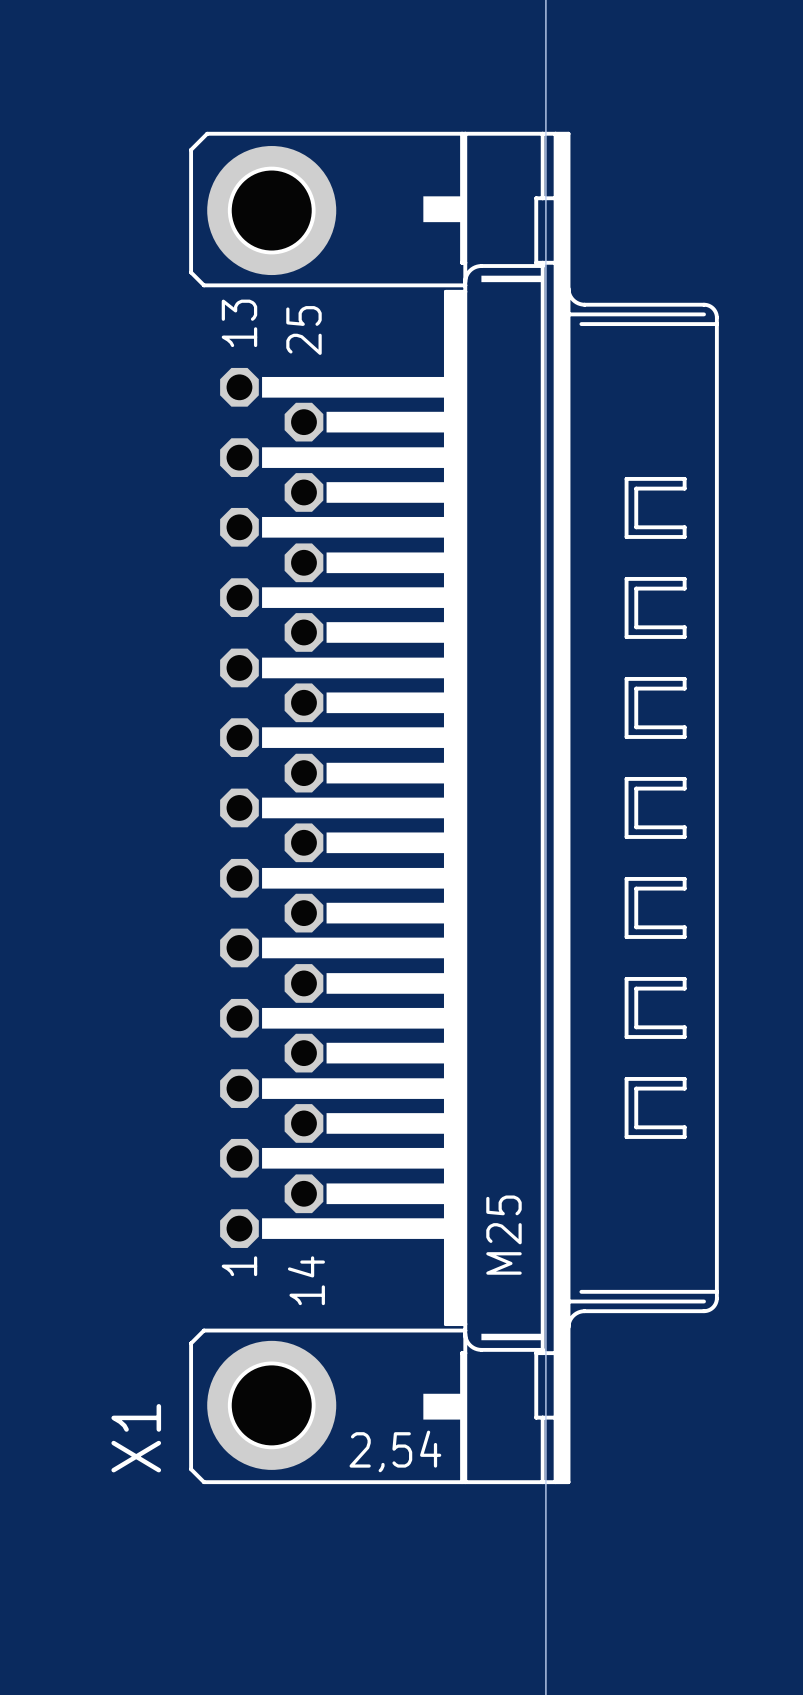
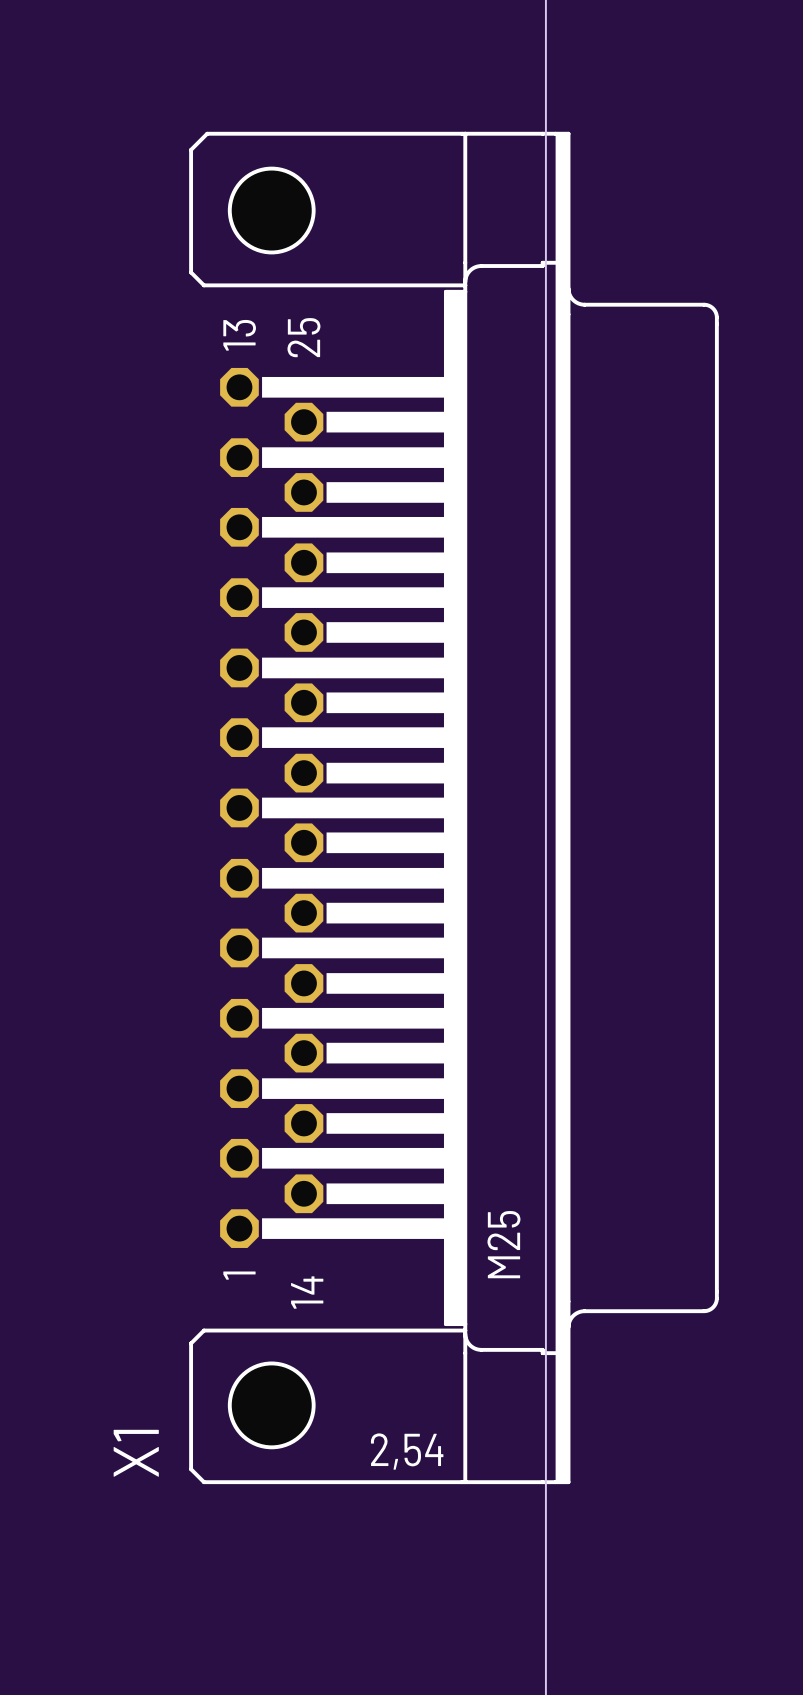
X1 footprint: [189, 131, 719, 1485] -> [189, 131, 719, 1485]

